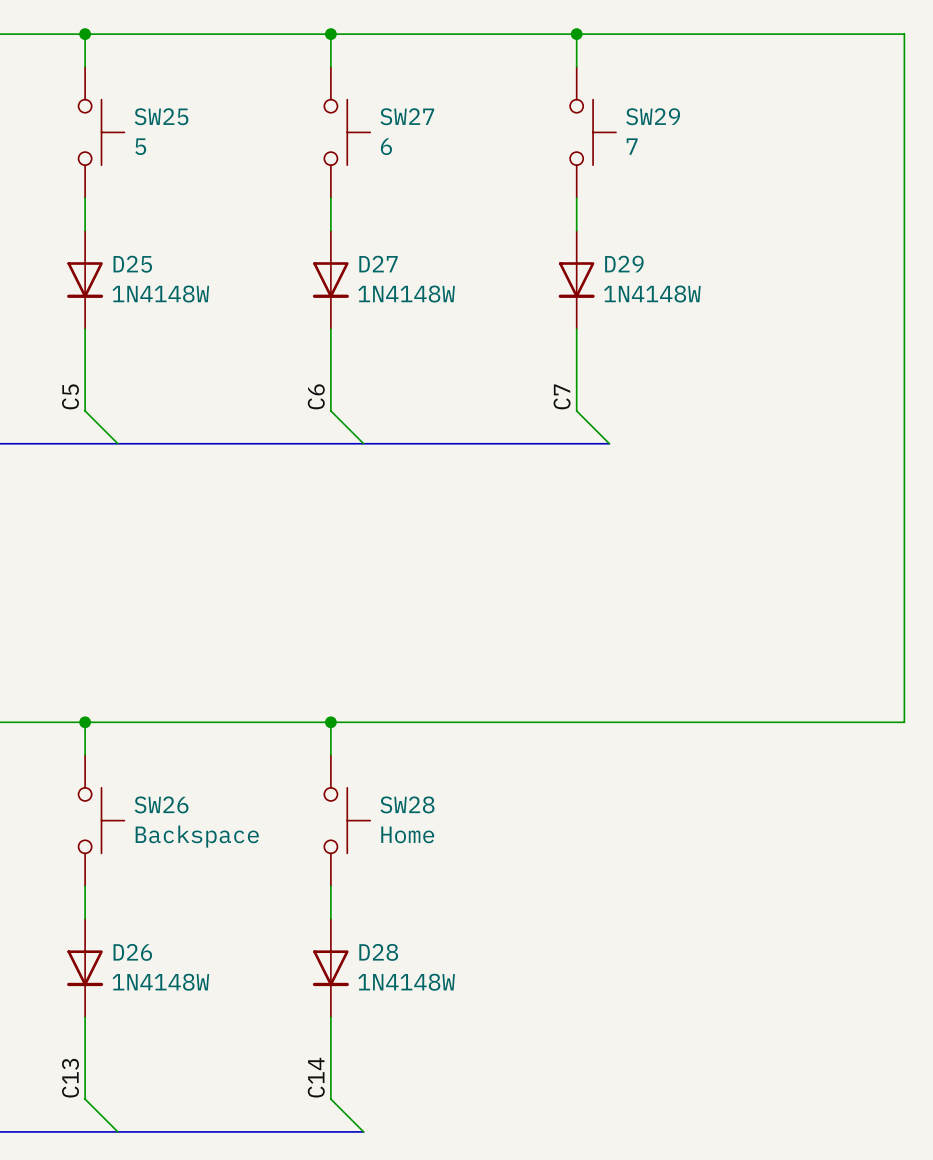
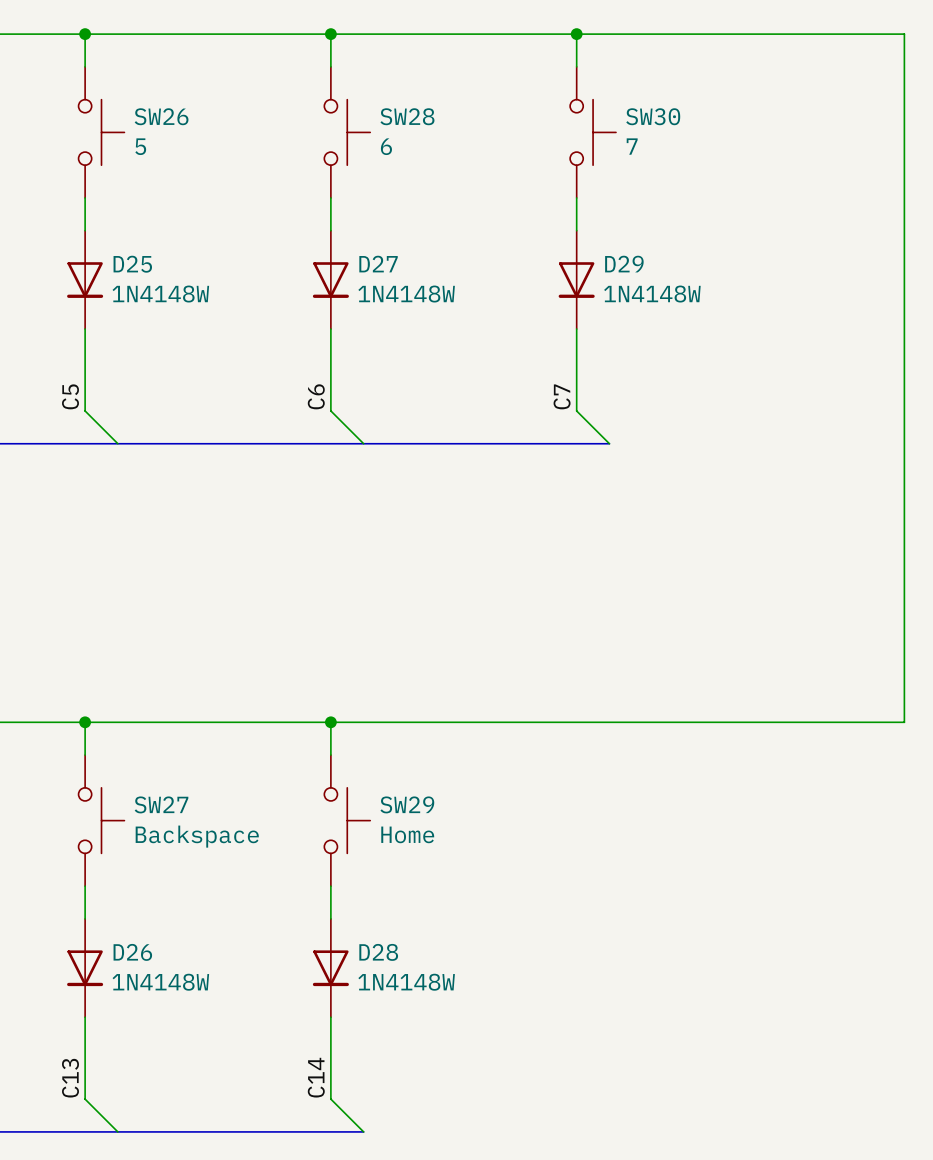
SW25 name: SW25 (161, 116) -> SW26 (161, 116)
SW27 name: SW27 (407, 116) -> SW28 (407, 116)
SW29 name: SW29 (653, 116) -> SW30 (653, 116)
SW26 name: SW26 (161, 804) -> SW27 (161, 804)
SW28 name: SW28 (407, 804) -> SW29 (407, 804)

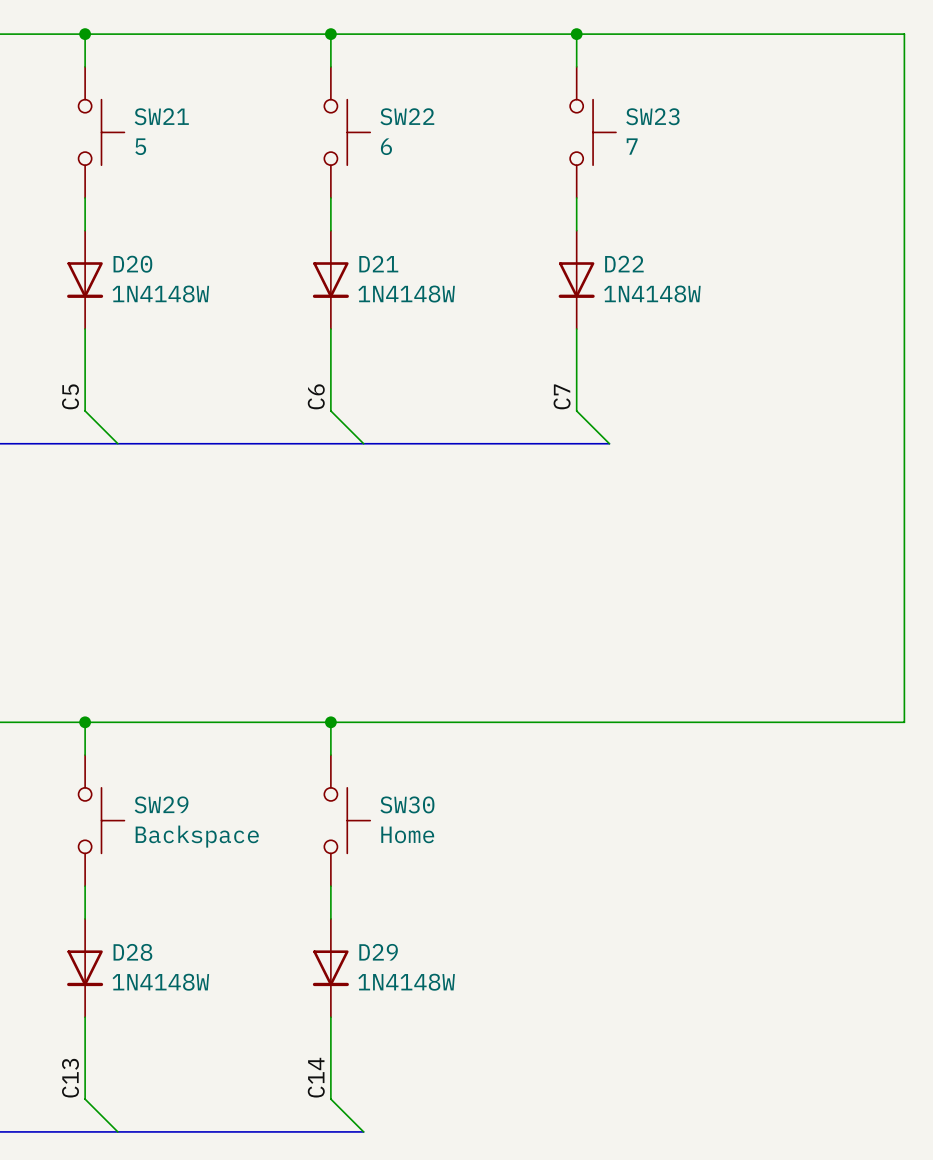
SW26 name: SW26 (161, 116) -> SW21 (161, 116)
SW28 name: SW28 (407, 116) -> SW22 (407, 116)
SW30 name: SW30 (653, 116) -> SW23 (652, 116)
D25 name: D25 (132, 264) -> D20 (132, 264)
D27 name: D27 (378, 264) -> D21 (378, 264)
D29 name: D29 (624, 264) -> D22 (624, 264)
SW27 name: SW27 (161, 804) -> SW29 (161, 804)
SW29 name: SW29 (407, 804) -> SW30 (407, 804)
D26 name: D26 (132, 952) -> D28 (132, 952)
D28 name: D28 (378, 952) -> D29 (378, 952)

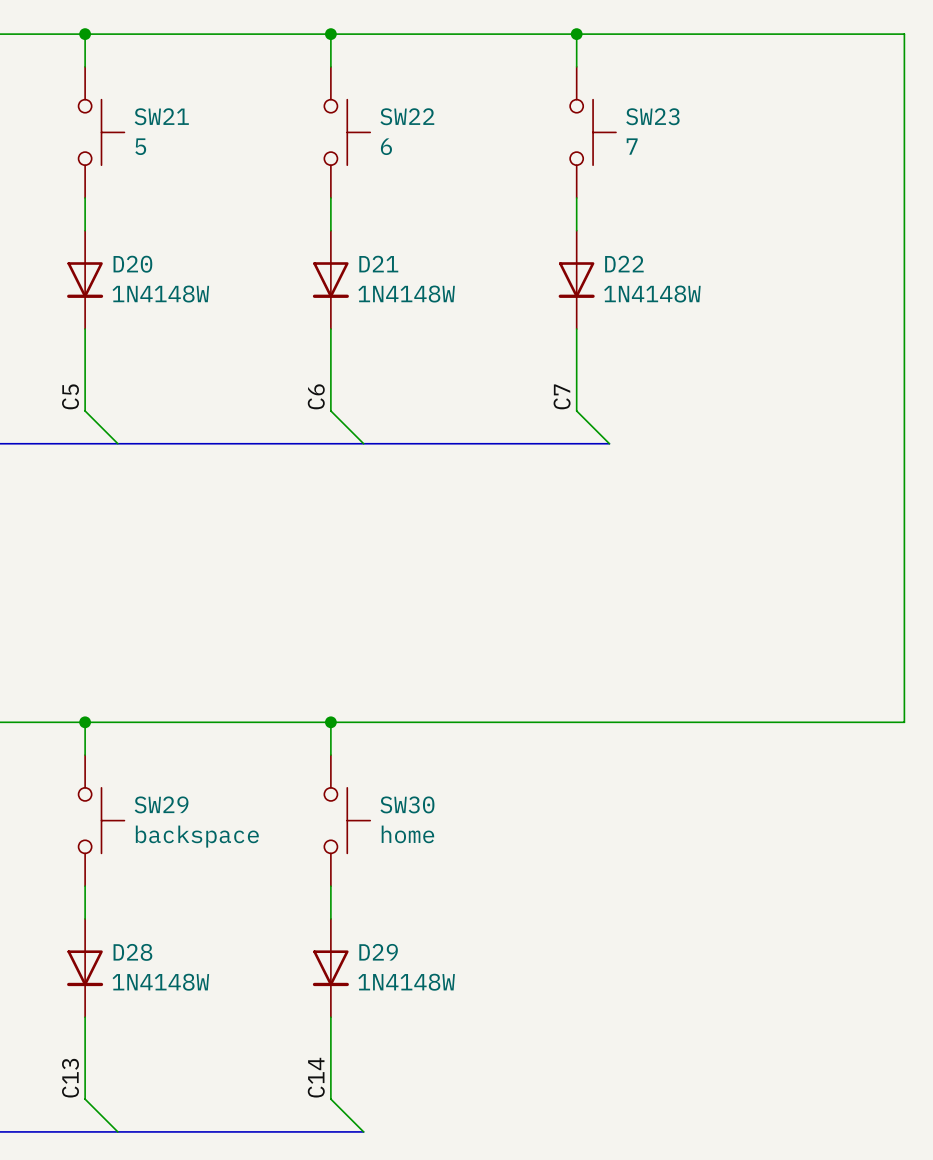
SW30 value: Home (407, 834) -> home (407, 834)
SW29 value: Backspace (197, 836) -> backspace (197, 836)

